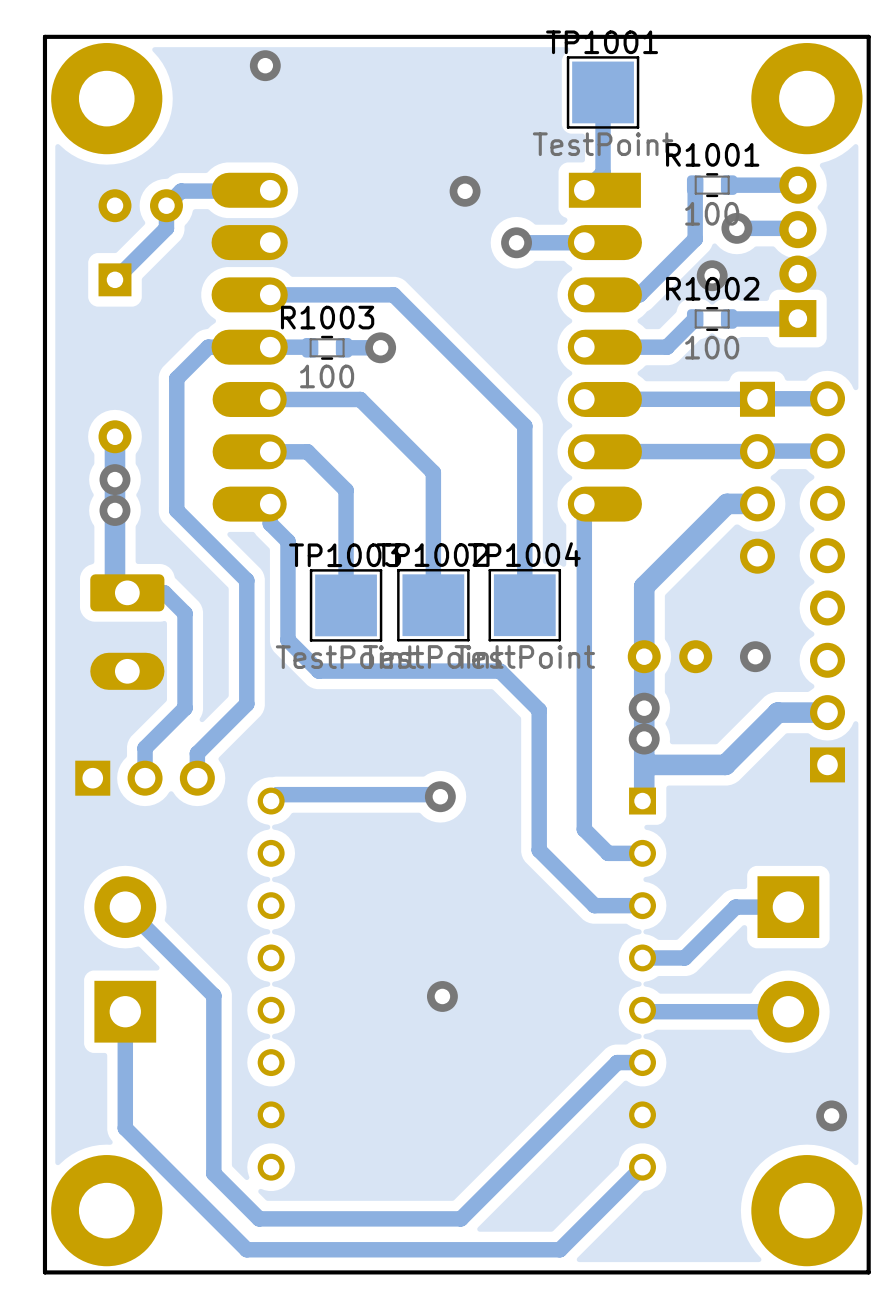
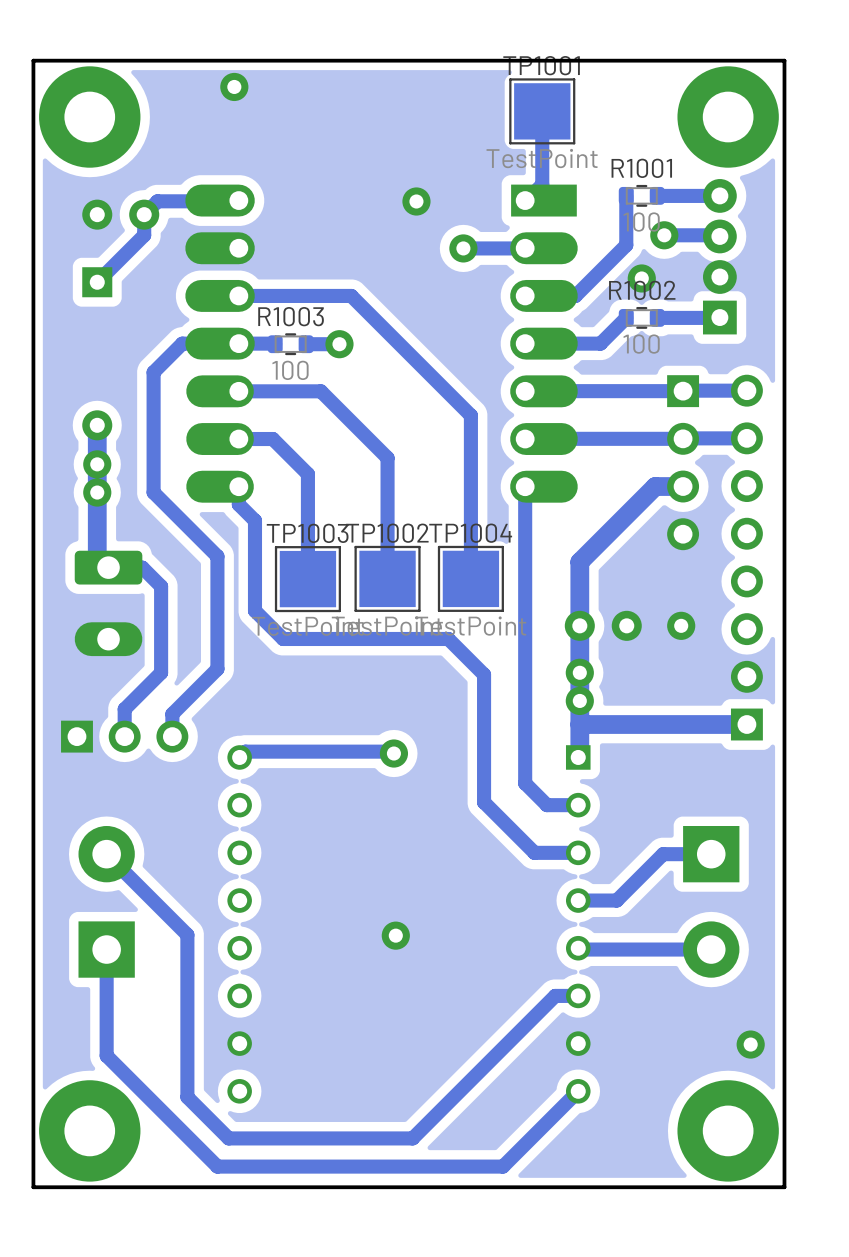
track: (827, 712) (777, 712) (725, 764) -> (746, 724) (653, 724)

